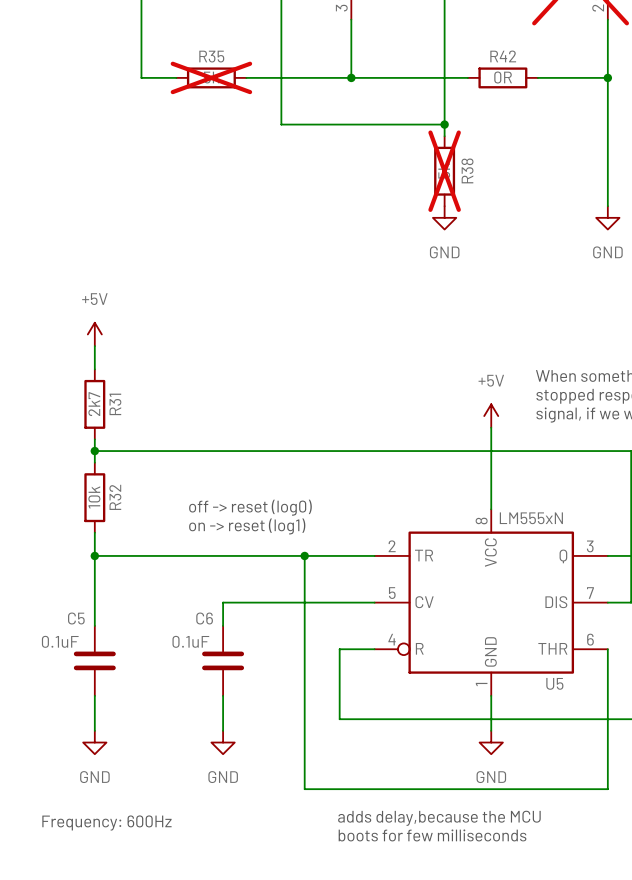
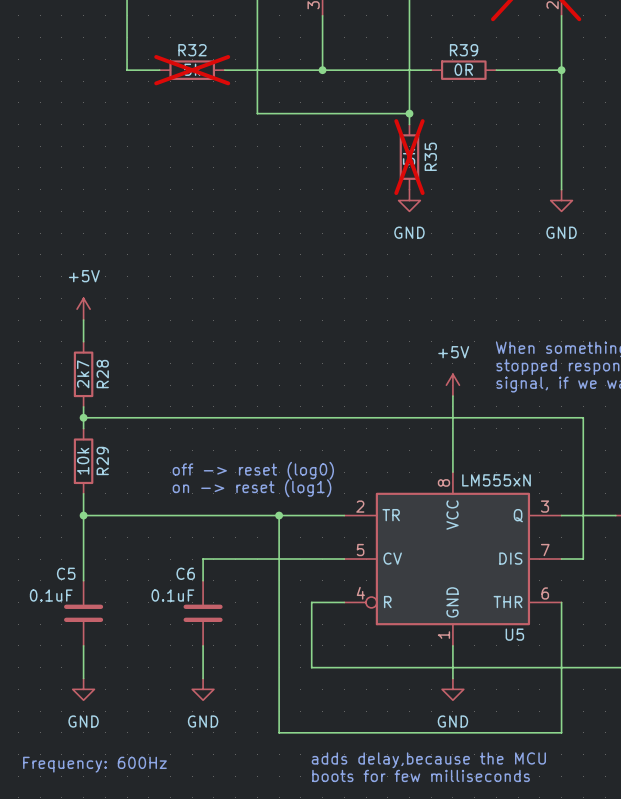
R35 name: R35 (211, 56) -> R32 (192, 50)
R42 name: R42 (503, 56) -> R39 (464, 50)
R38 name: R38 (467, 170) -> R35 (430, 156)
R31 name: R31 (115, 404) -> R28 (102, 374)
R32 name: R32 (115, 497) -> R29 (102, 460)

